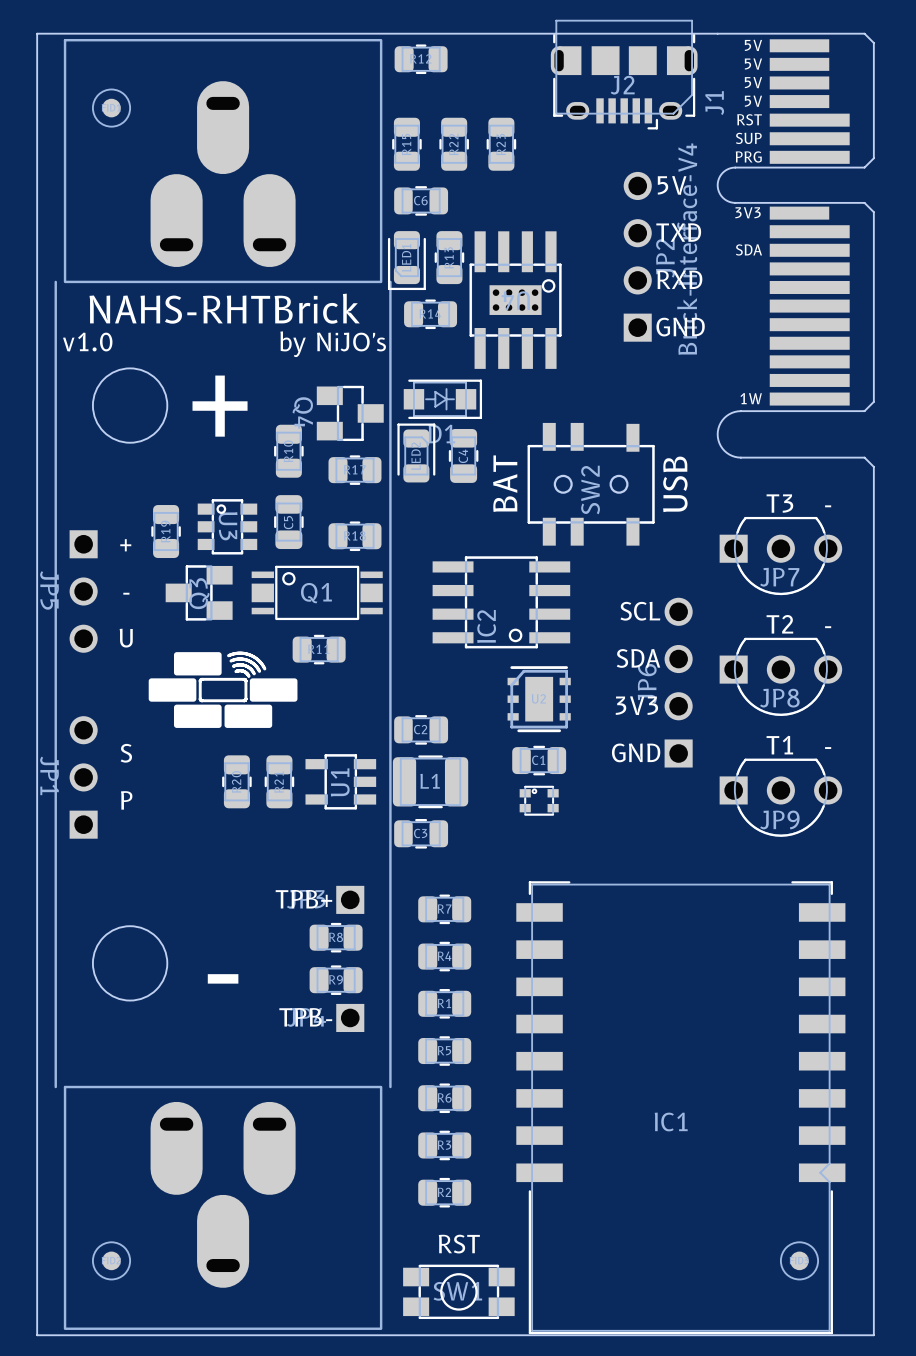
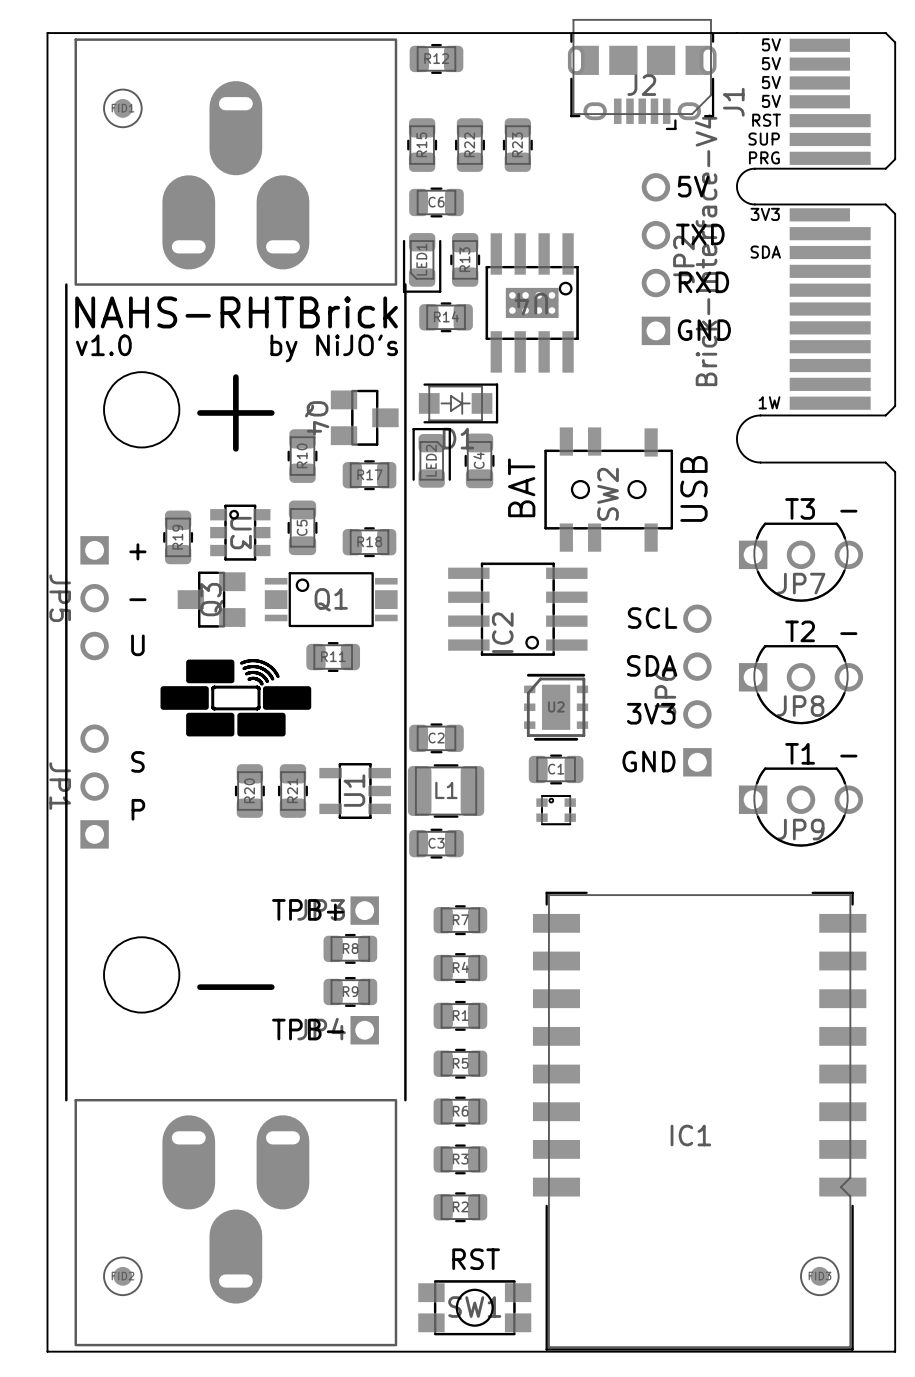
part footprint: [54, 38, 392, 1330] -> [65, 38, 407, 1347]

